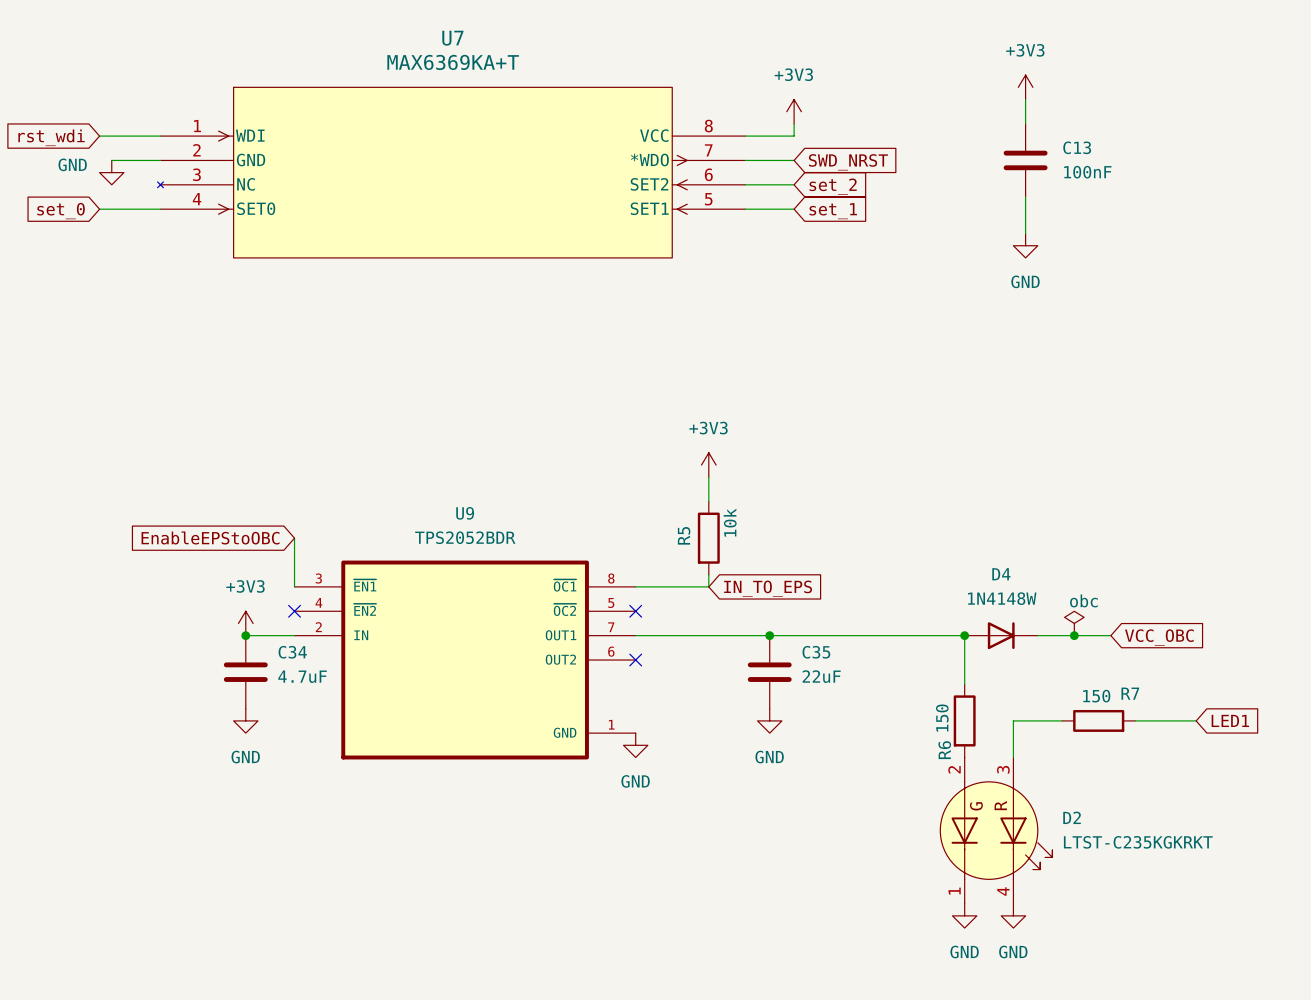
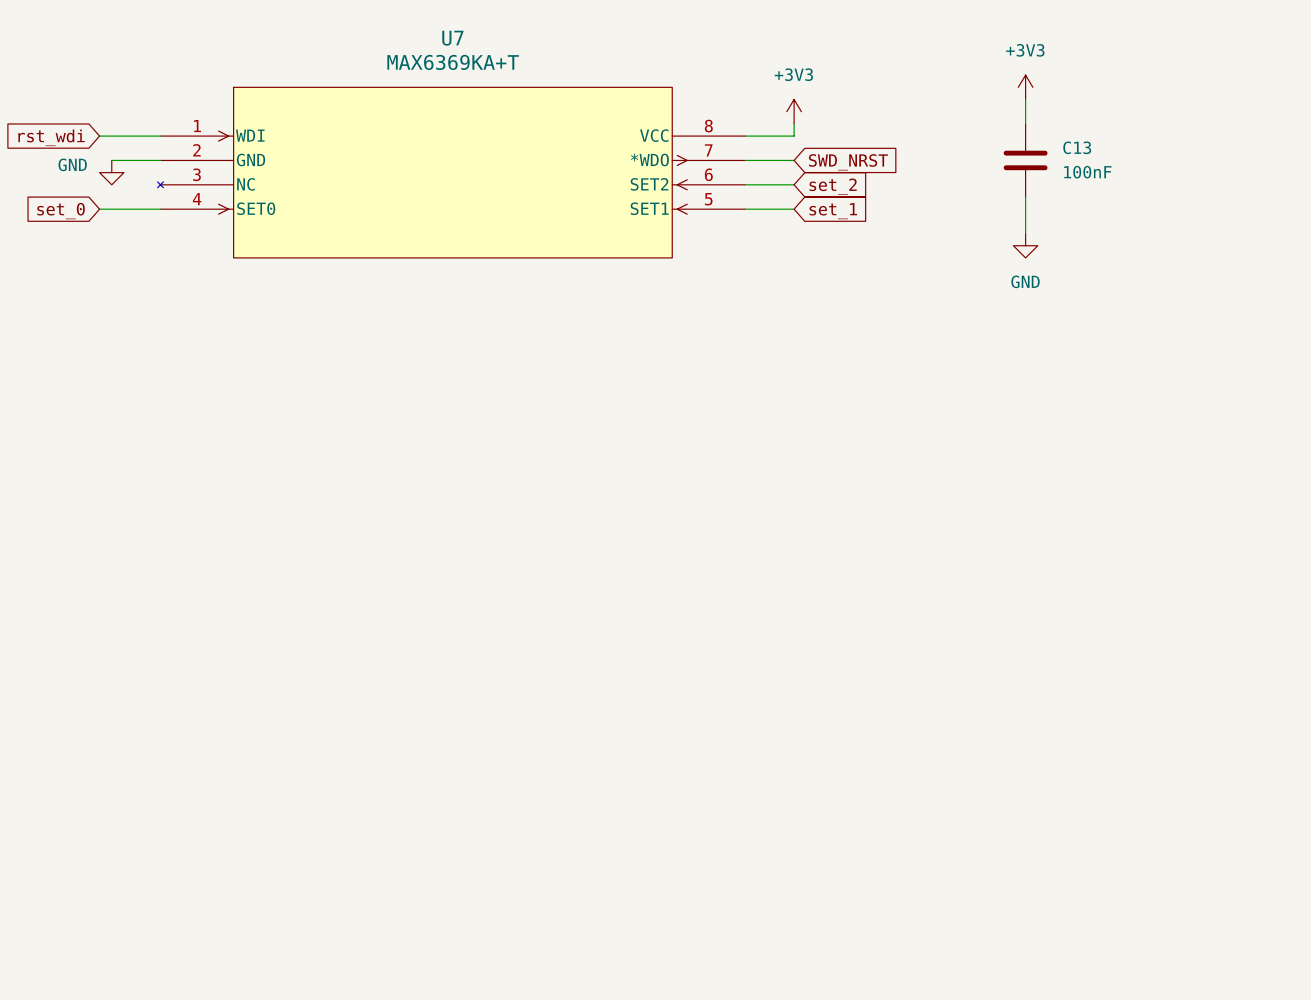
power symbol: +3V3 (708, 465) -> none
wire: (708, 477) (708, 501) -> none
global label: EnableEPStoOBC (210, 537) -> none
wire: (294, 538) (294, 586) -> none
R5: 10k (708, 538) -> none
wire: (708, 574) (708, 586) (635, 586) -> none
global label: IN_TO_EPS (768, 588) -> none
no-connect mark: (294, 611) -> none
no-connect mark: (635, 611) -> none
power symbol: +3V3 (245, 623) -> none
power symbol: obc (1074, 623) -> none
wire: (245, 635) (294, 635) -> none
junction: (245, 635) -> none
wire: (635, 635) (964, 635) (964, 684) -> none
junction: (769, 635) -> none
junction: (964, 635) -> none
D4: 1N4148W (1001, 635) -> none
wire: (1037, 635) (1110, 635) -> none
junction: (1074, 635) -> none
global label: VCC_OBC (1159, 637) -> none
U9: TPS2052BDR (465, 660) -> none
no-connect mark: (635, 660) -> none
C34: 4.7uF (245, 672) -> none
C35: 22uF (769, 672) -> none
power symbol: GND (245, 720) -> none
power symbol: GND (769, 720) -> none
R6: 150 (964, 720) -> none
wire: (1062, 720) (1013, 720) (1013, 757) -> none
R7: 150 (1098, 720) -> none
wire: (1135, 720) (1196, 720) -> none
global label: LED1 (1230, 720) -> none
power symbol: GND (635, 745) -> none
D2: LTST-C235KGKRKT (996, 830) -> none
power symbol: GND (964, 915) -> none
power symbol: GND (1013, 915) -> none

